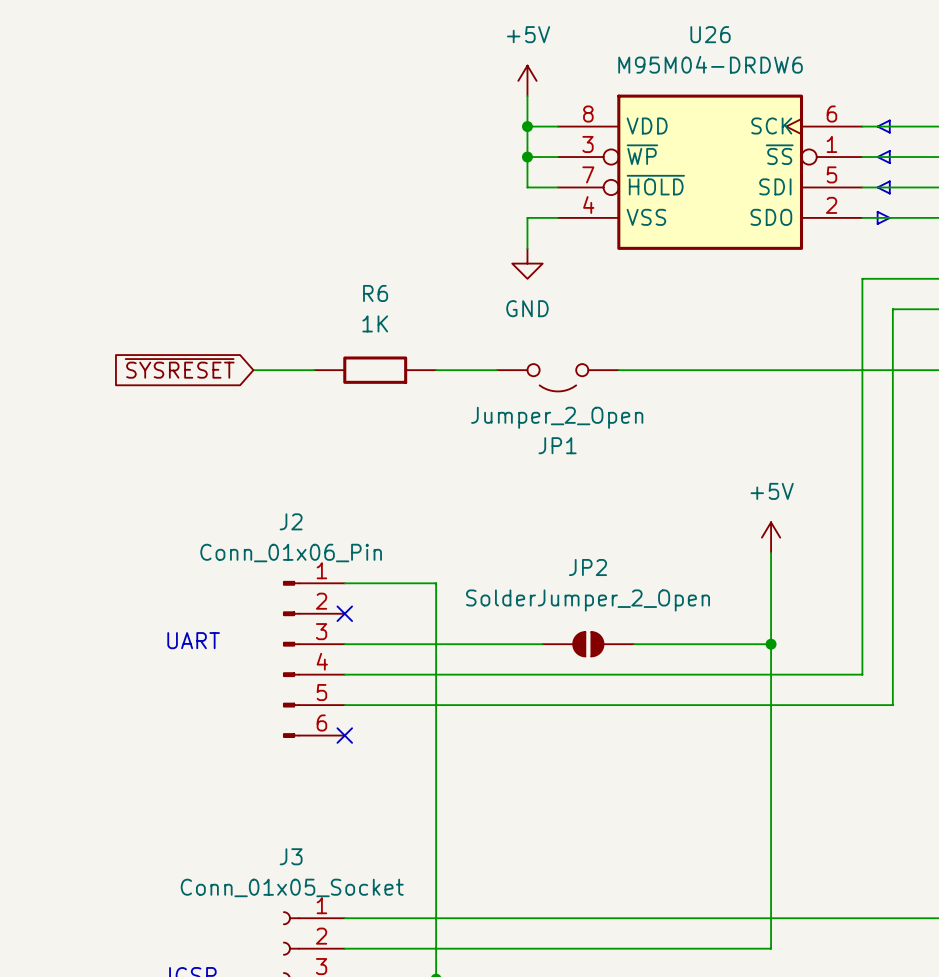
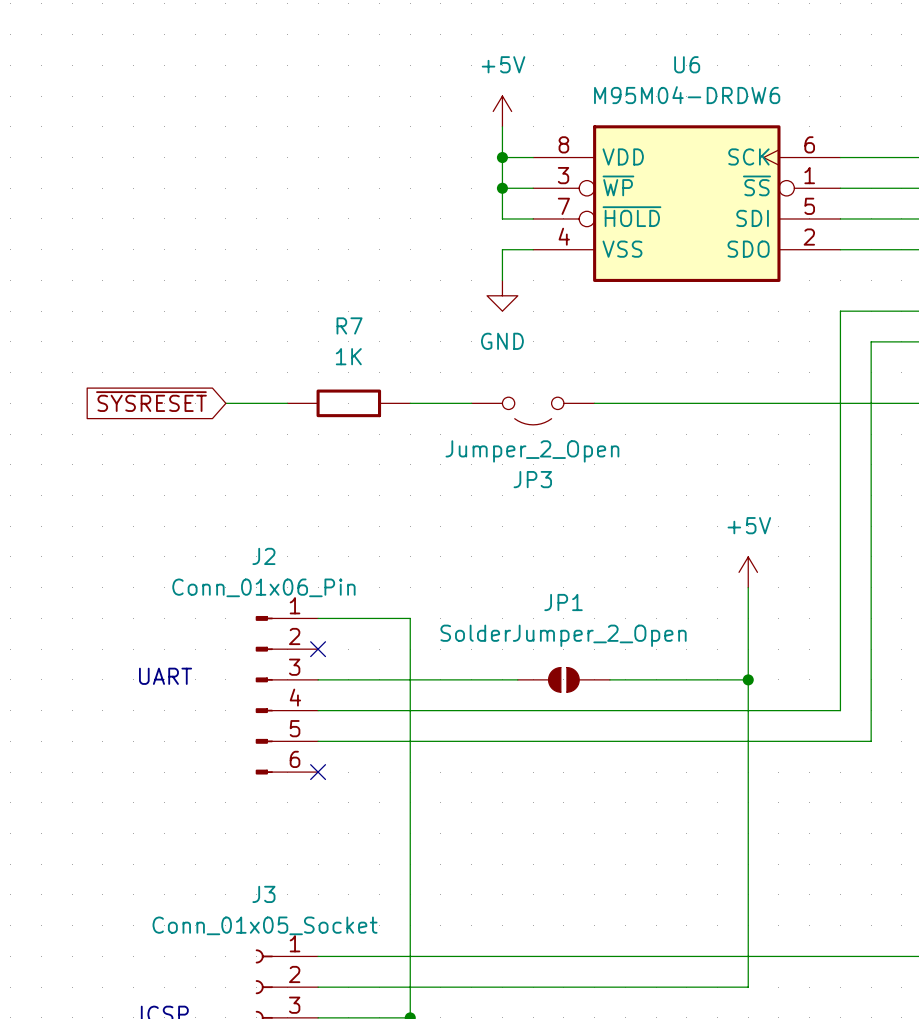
U26 name: U26 (710, 34) -> U6 (687, 64)
line: (889, 120) (889, 132) (877, 126) (889, 120) -> none
line: (889, 150) (889, 163) (877, 157) (889, 150) -> none
line: (889, 181) (877, 187) (889, 193) (889, 181) -> none
line: (877, 211) (877, 224) (889, 217) (877, 211) -> none
R6 name: R6 (375, 293) -> R7 (349, 325)
JP1 name: JP1 (557, 445) -> JP3 (532, 479)
JP2 name: JP2 (588, 567) -> JP1 (563, 602)

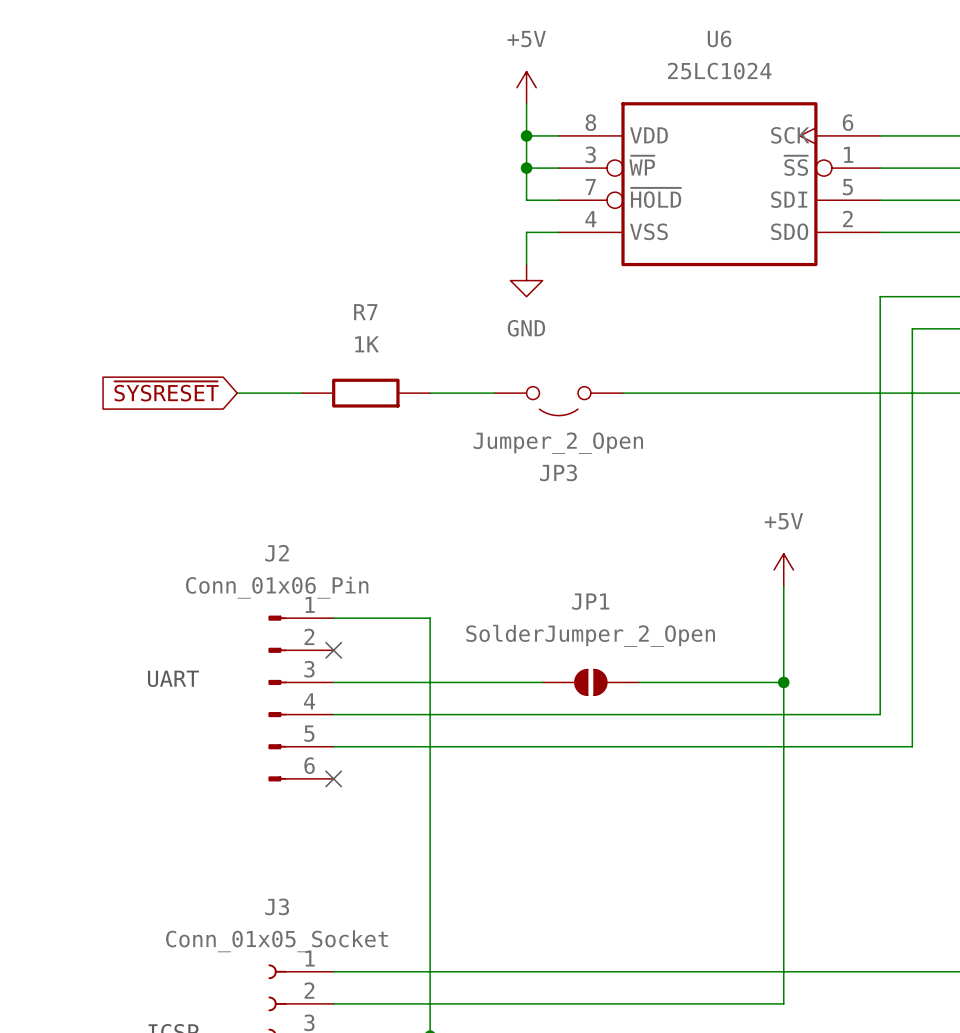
U6 value: M95M04-DRDW6 (687, 95) -> 25LC1024 (719, 71)

